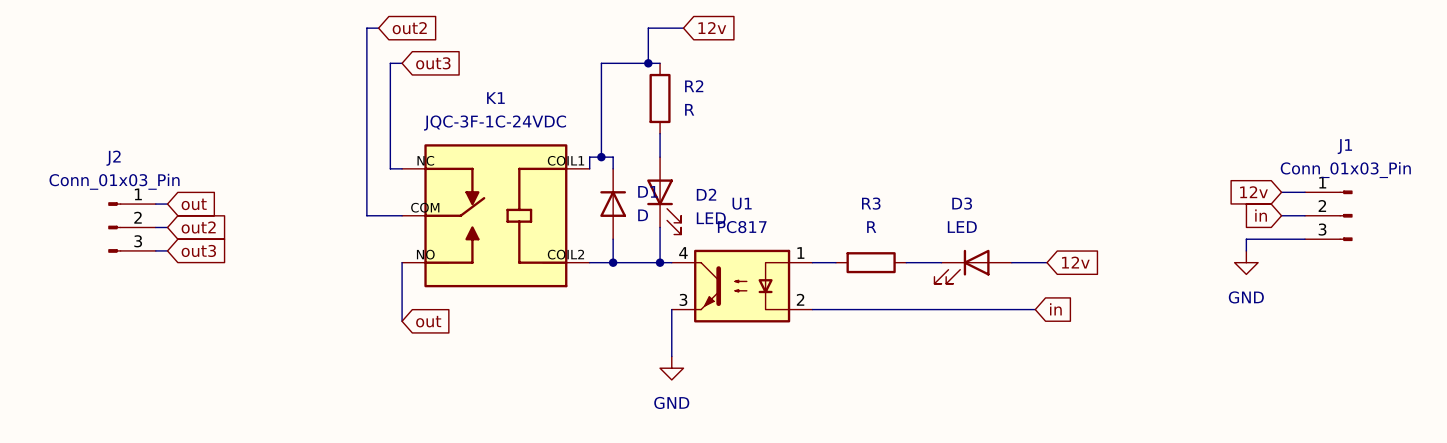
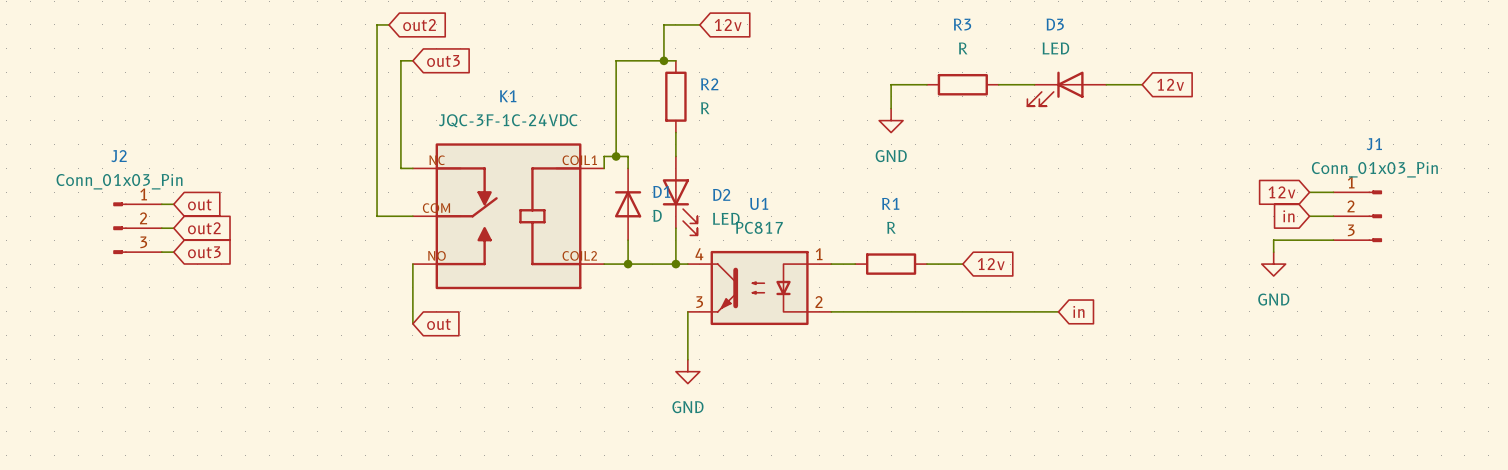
wire: none -> (926, 84) (891, 84) (891, 108)
R3: none -> R (962, 84)
wire: none -> (1106, 84) (1142, 84)
global label: none -> 12v (1170, 84)
power symbol: none -> GND (891, 120)
R3 name: R3 (871, 203) -> R1 (890, 203)
global label: none -> 12v (991, 264)
wire: (1011, 262) (1047, 262) -> (998, 84) (1034, 84)
global label: 12v (1075, 262) -> none
D3 position: (973, 266) -> (1066, 88)

